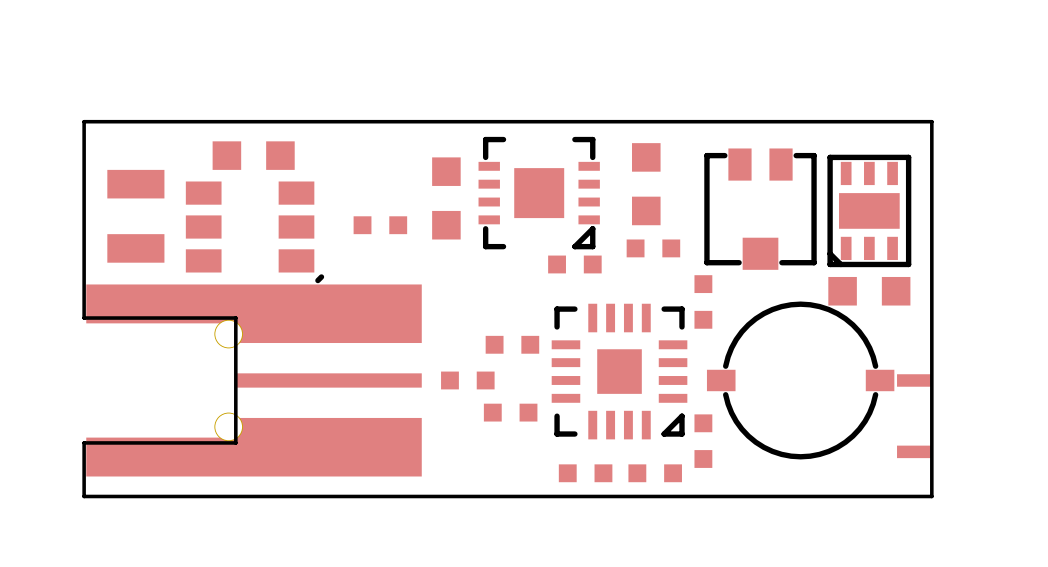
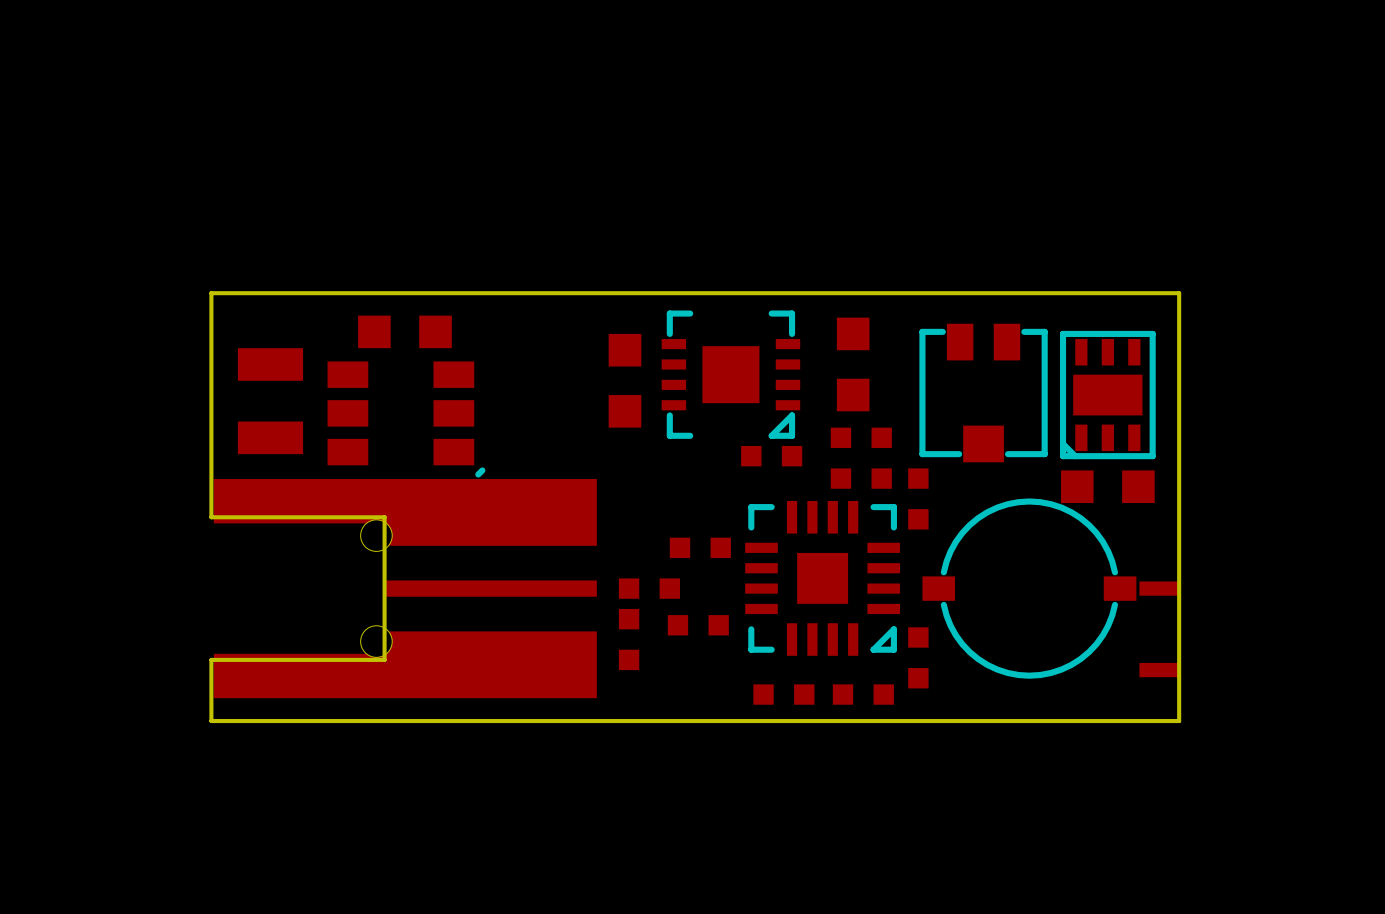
part: (380, 225) -> none
part: none -> (861, 478)
part: none -> (629, 639)

